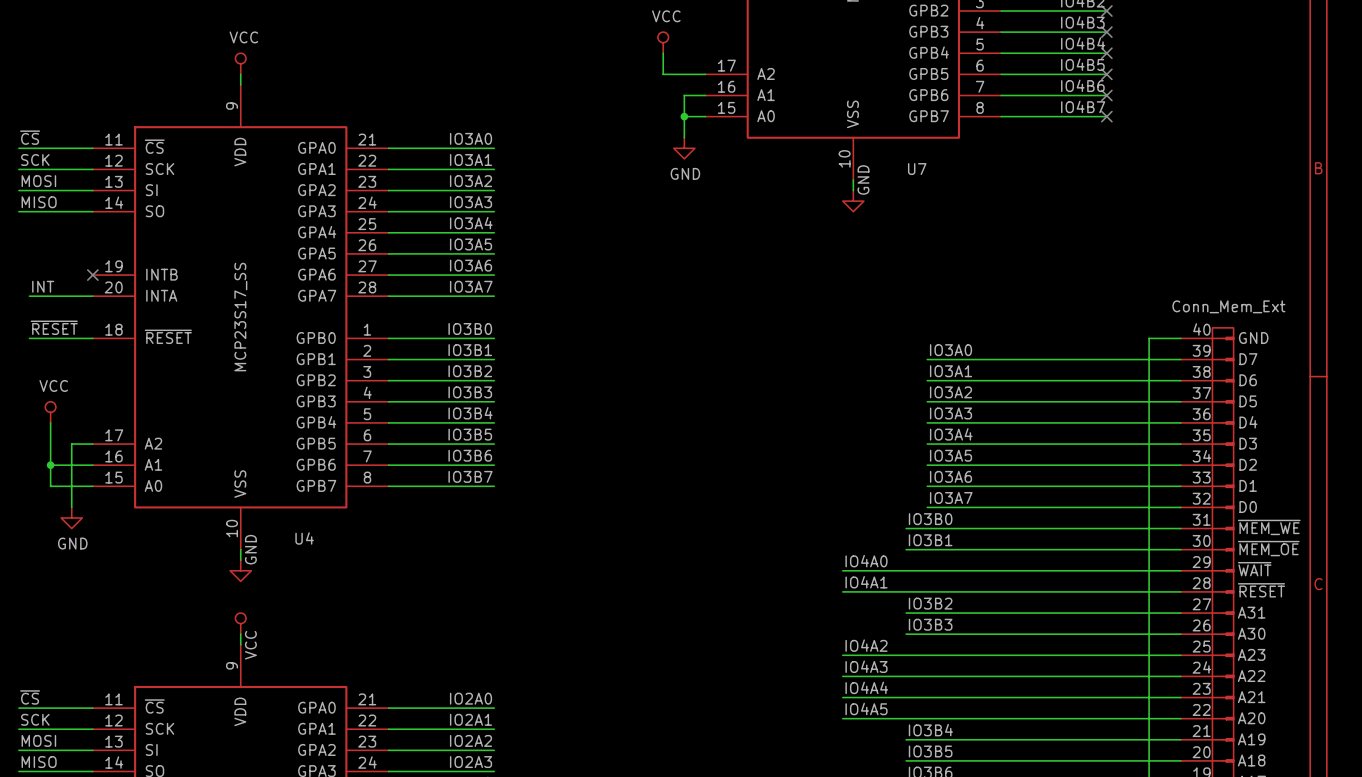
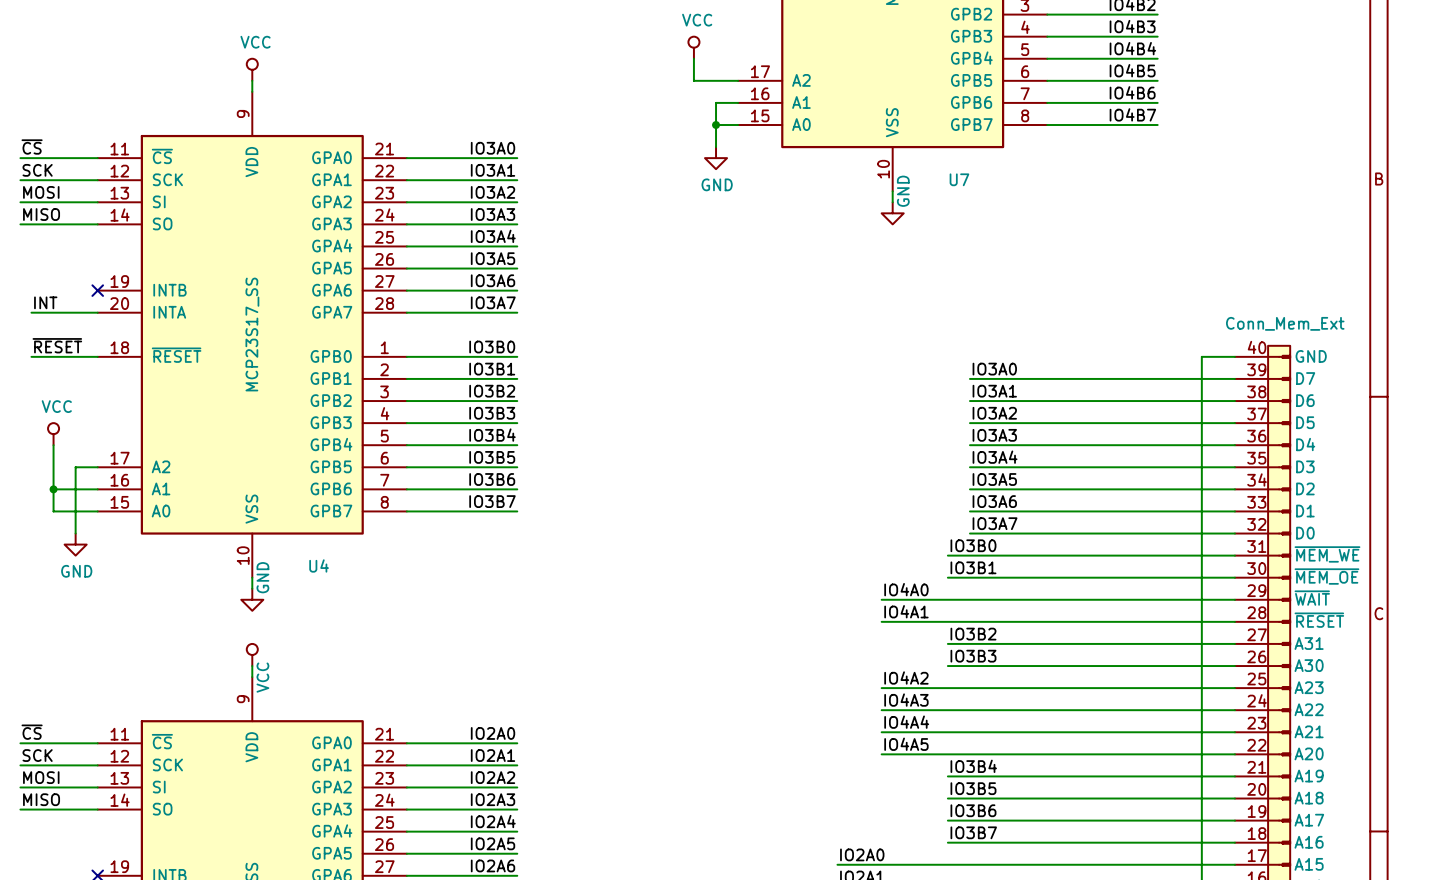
no-connect mark: (1106, 10) -> none
no-connect mark: (1106, 32) -> none
no-connect mark: (1106, 53) -> none
no-connect mark: (1106, 74) -> none
no-connect mark: (1106, 95) -> none
no-connect mark: (1106, 116) -> none

